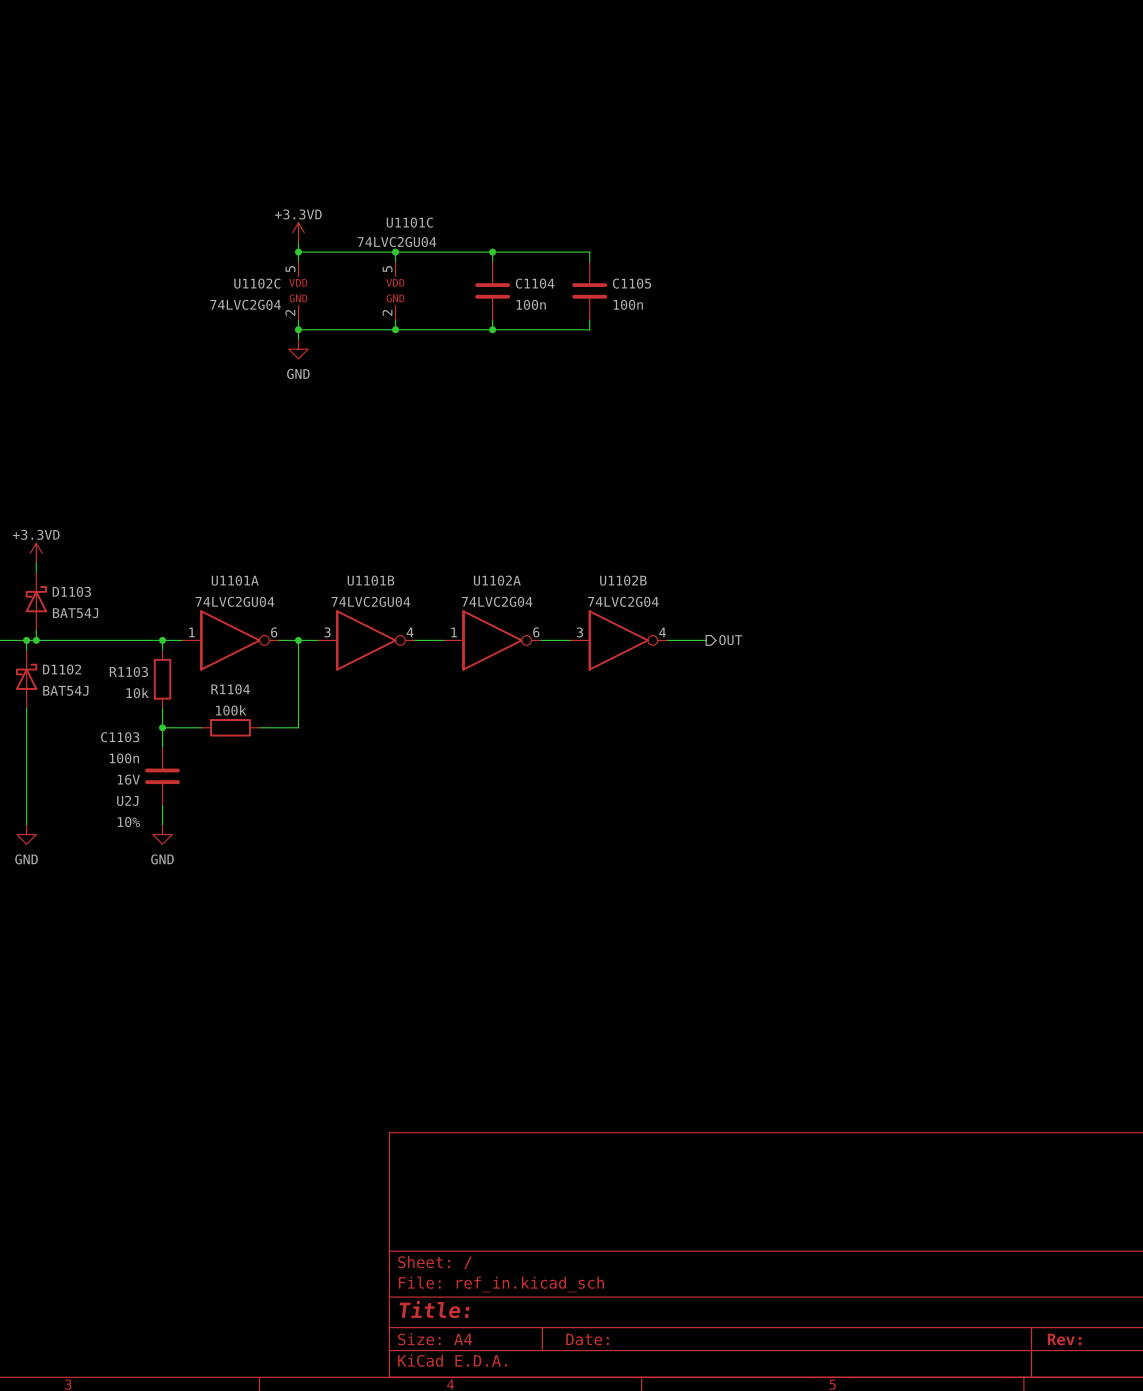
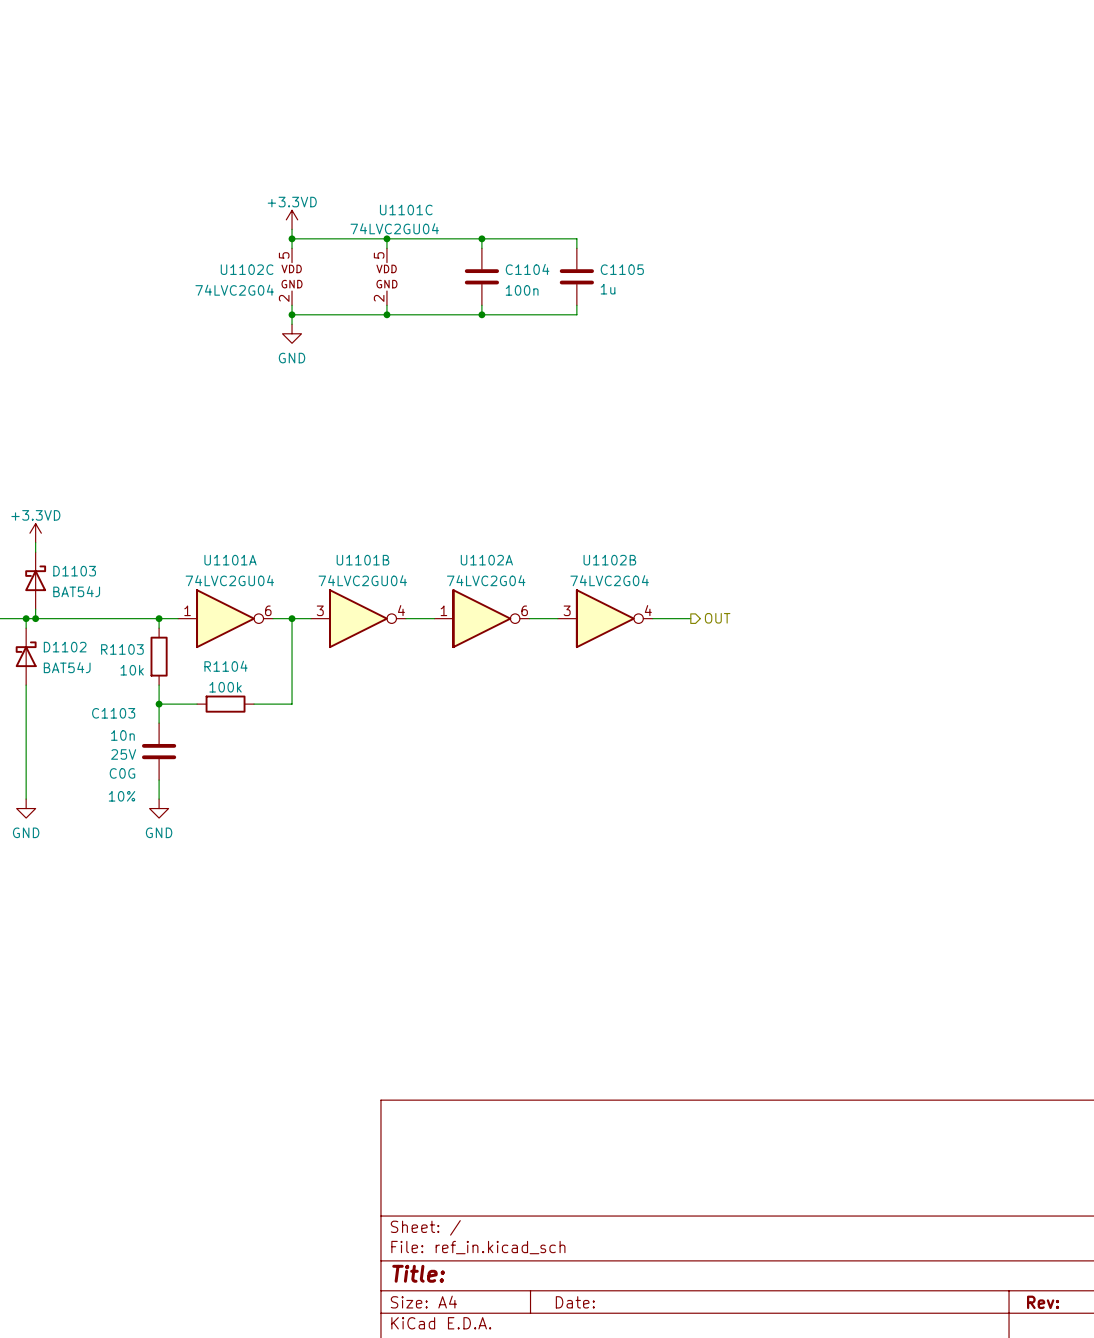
C1105 value: 100n (628, 304) -> 1u (608, 289)
C1103 value: 100n (124, 758) -> 10n (122, 735)
C1103 text: 16V (128, 779) -> 25V (123, 754)
C1103 text: U2J (127, 800) -> C0G (122, 773)

